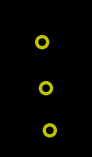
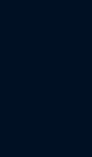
part: (42, 42) -> none
part: (45, 88) -> none
part: (49, 130) -> none

